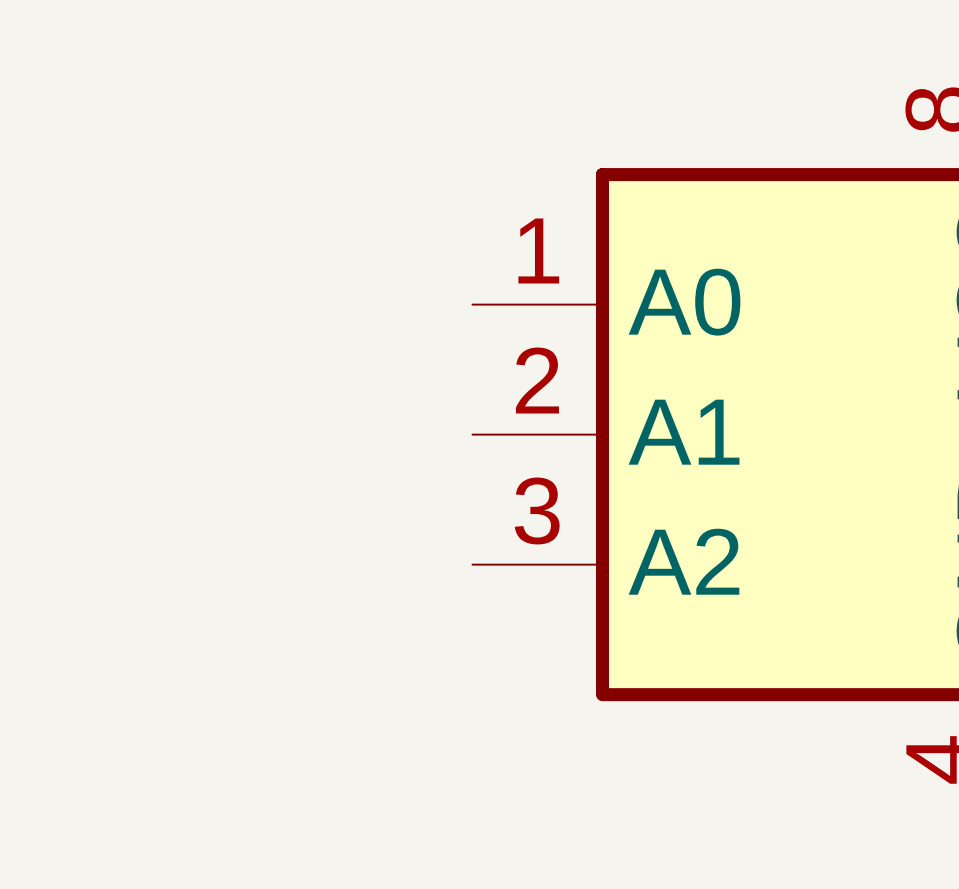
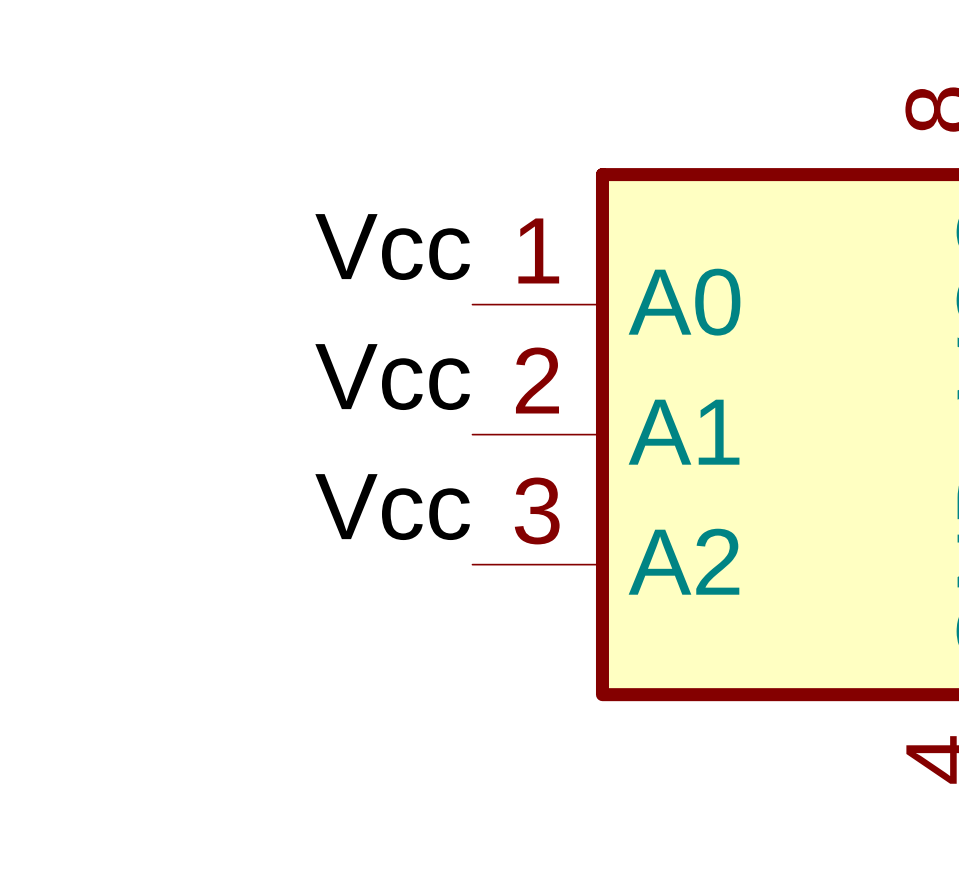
label: none -> Vcc (392, 247)
label: none -> Vcc (392, 377)
label: none -> Vcc (392, 507)

